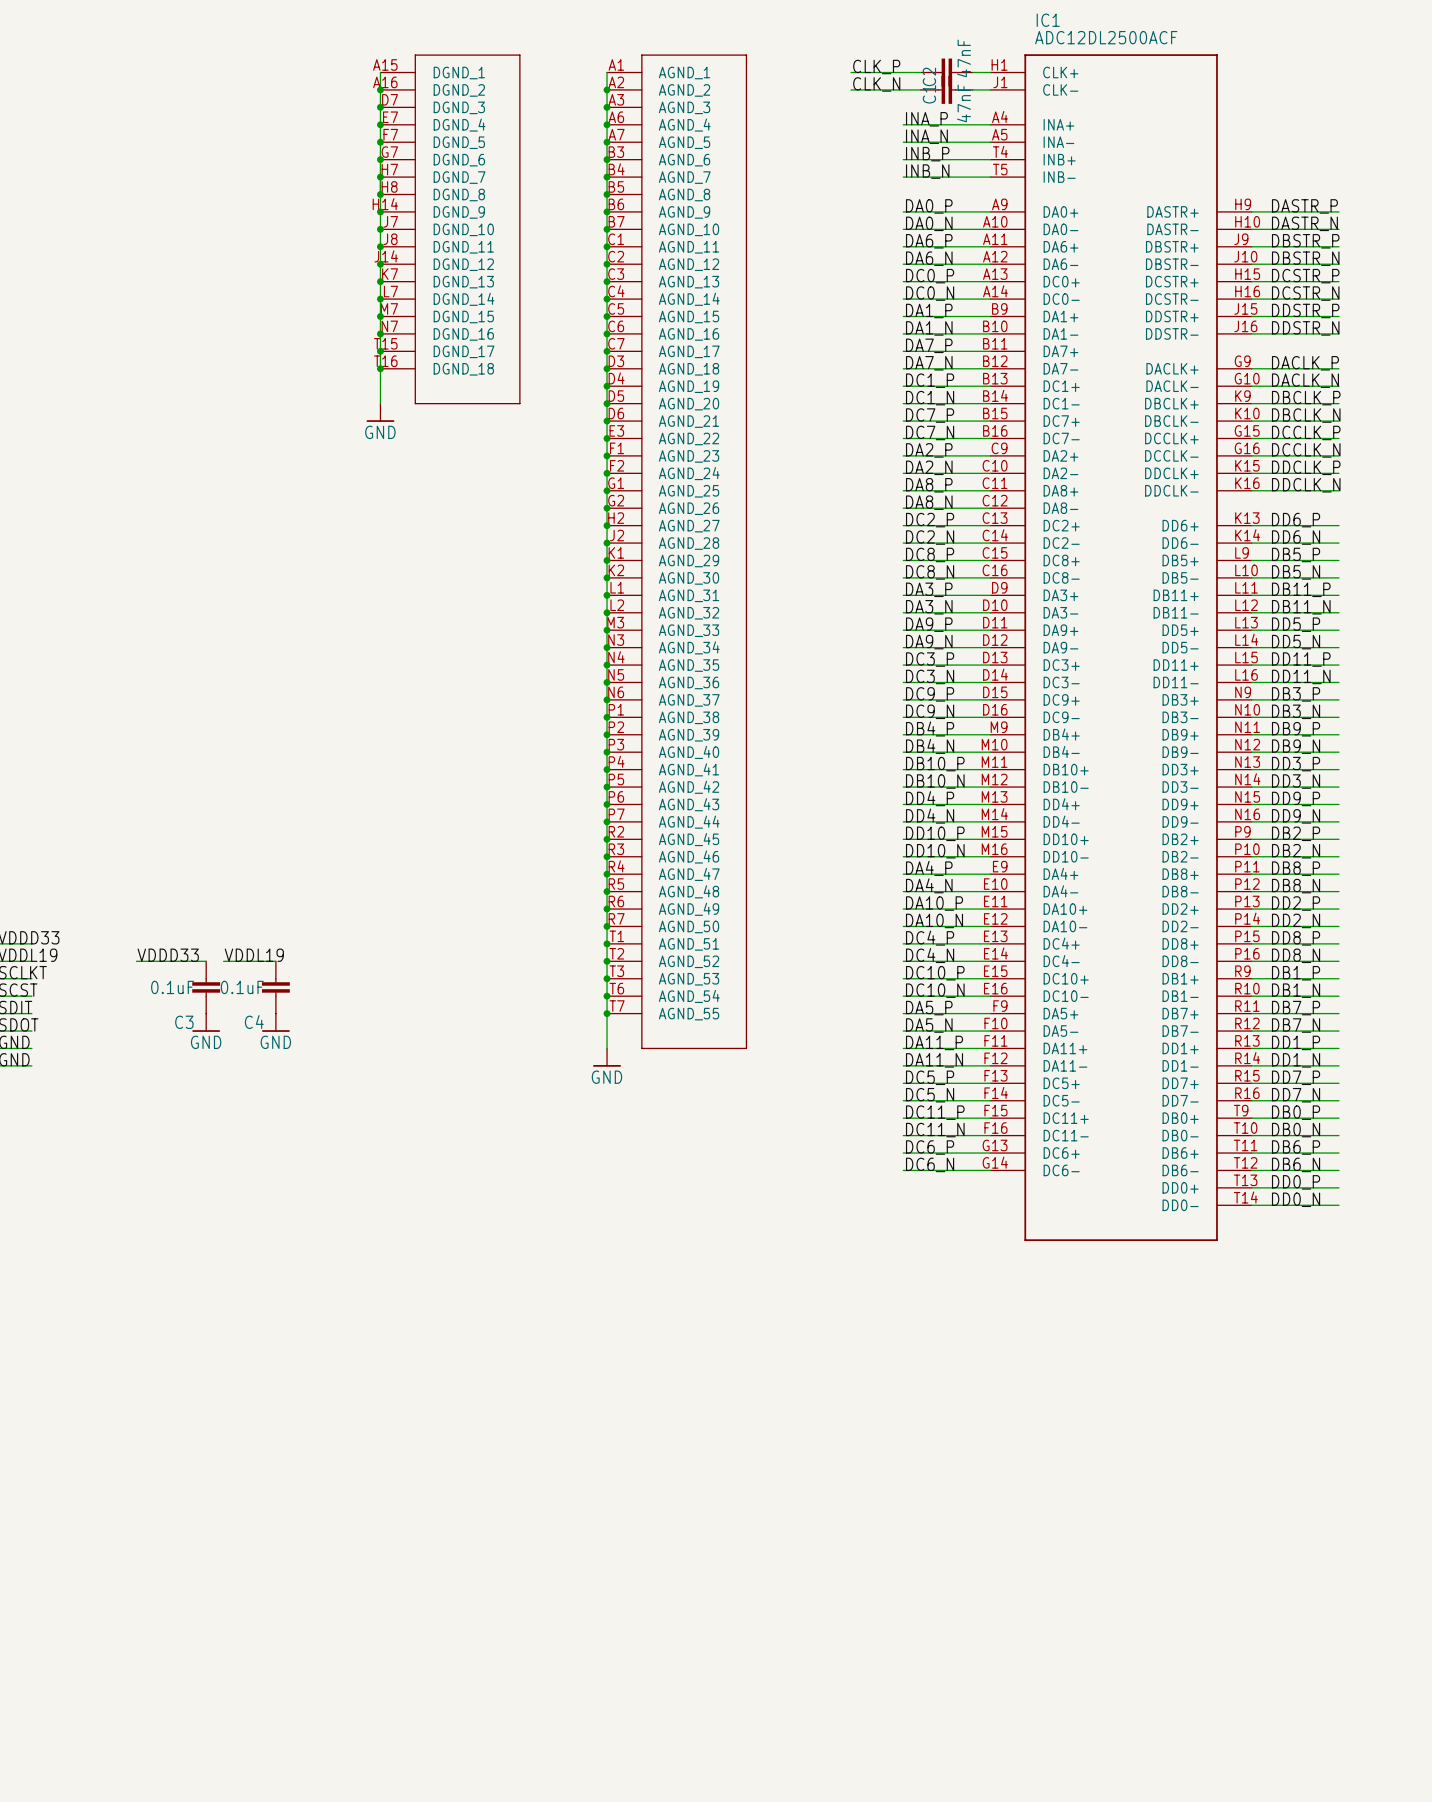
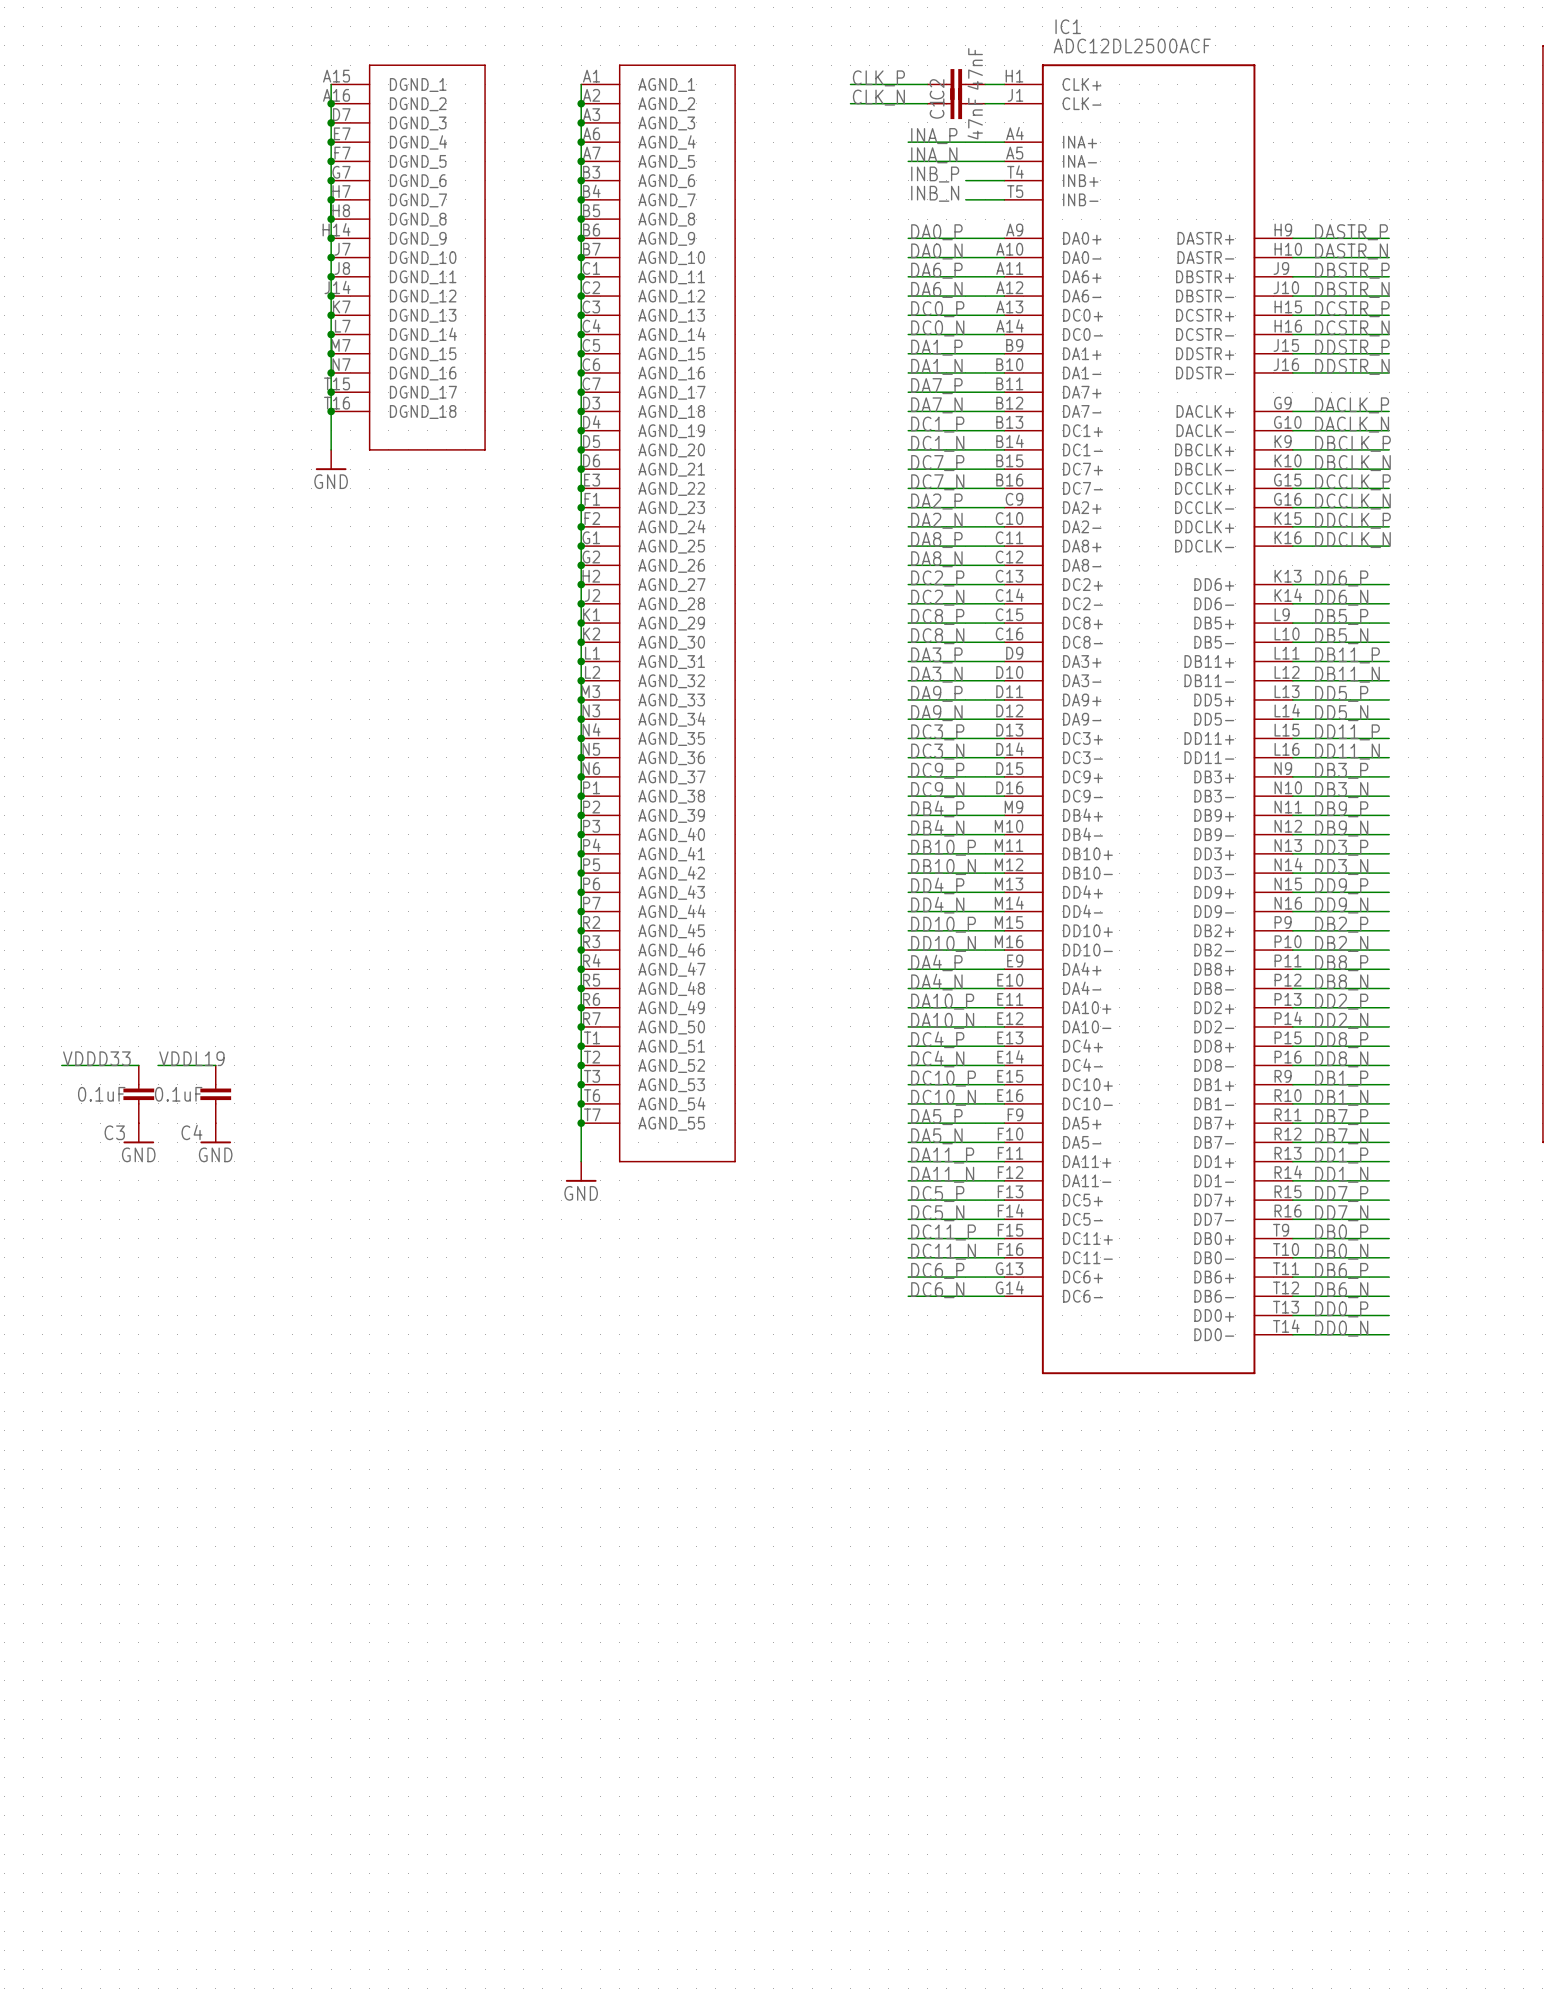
wire: (903, 159) (955, 159) -> none
wire: (903, 177) (955, 177) -> none

